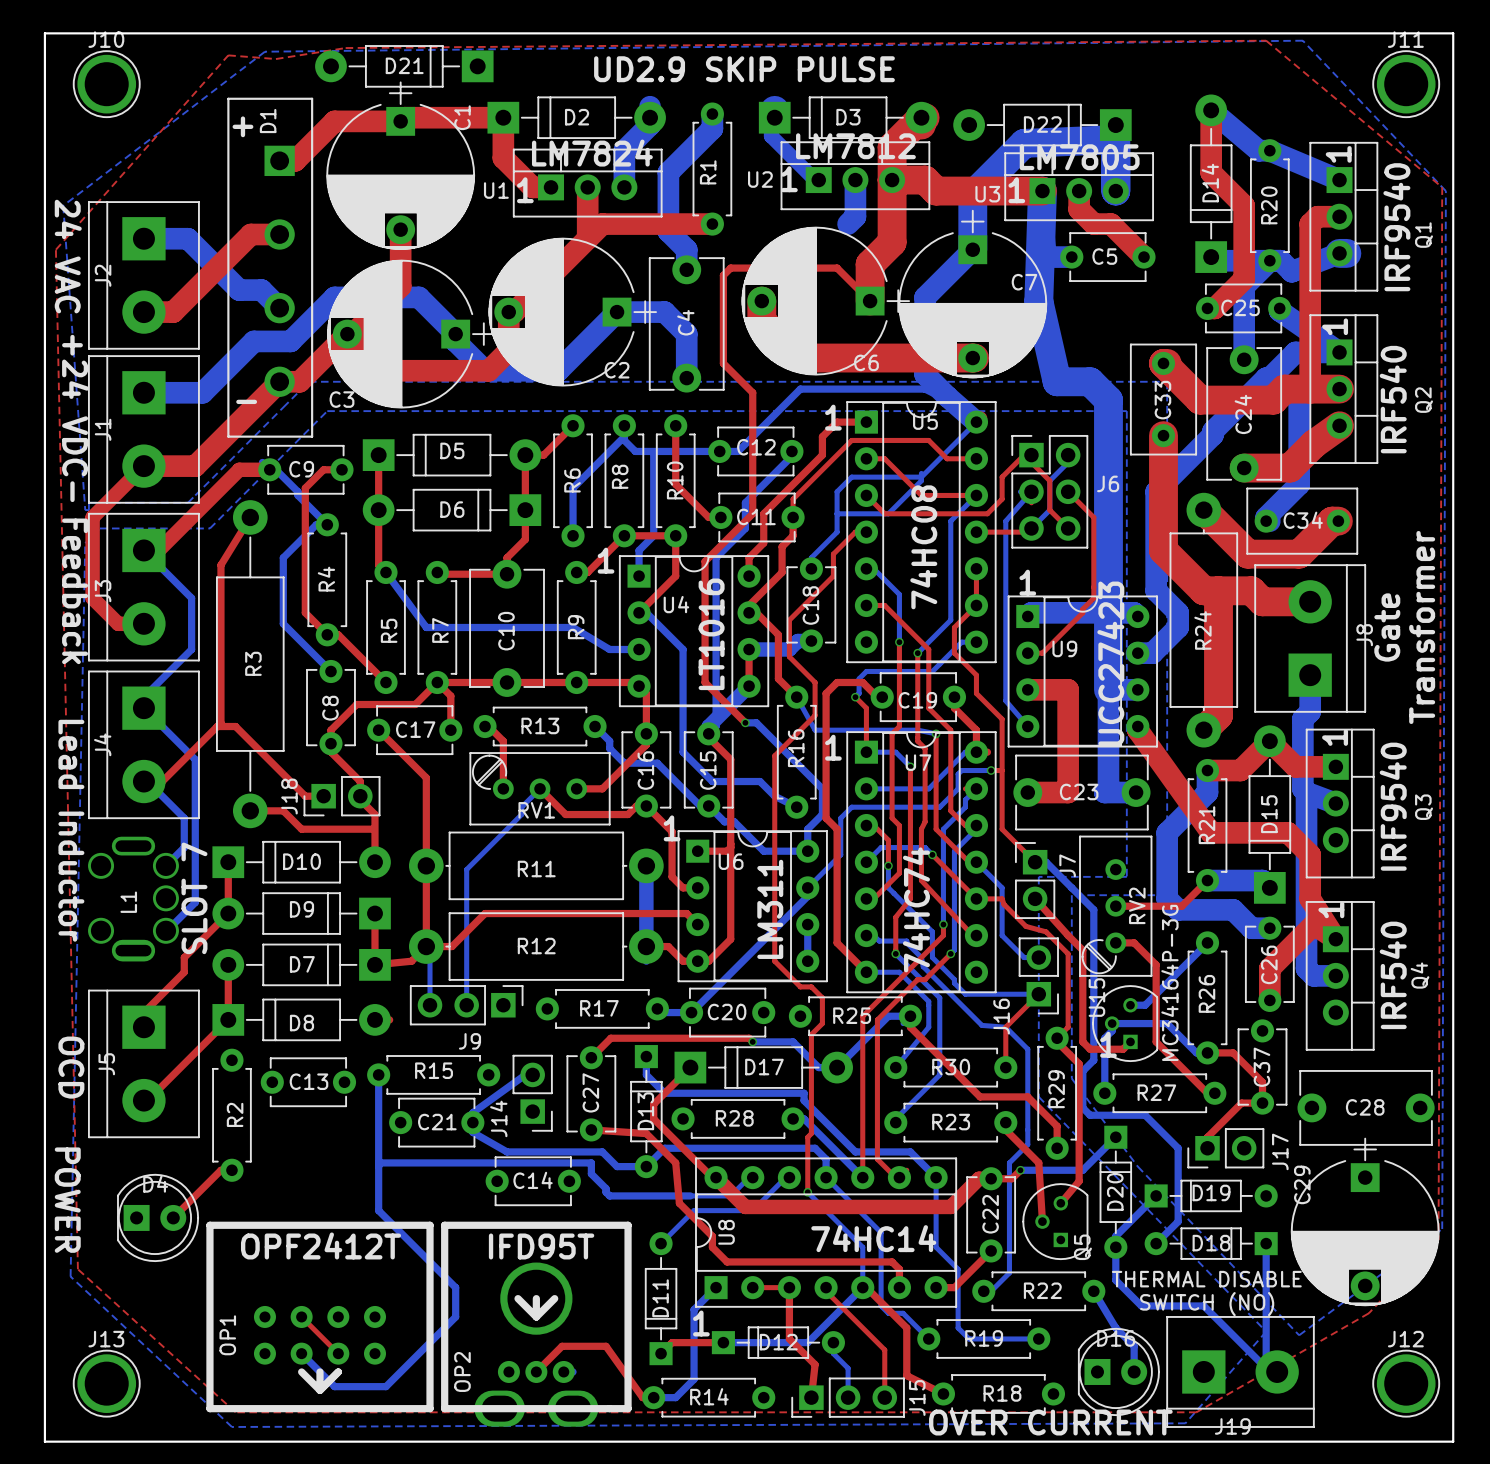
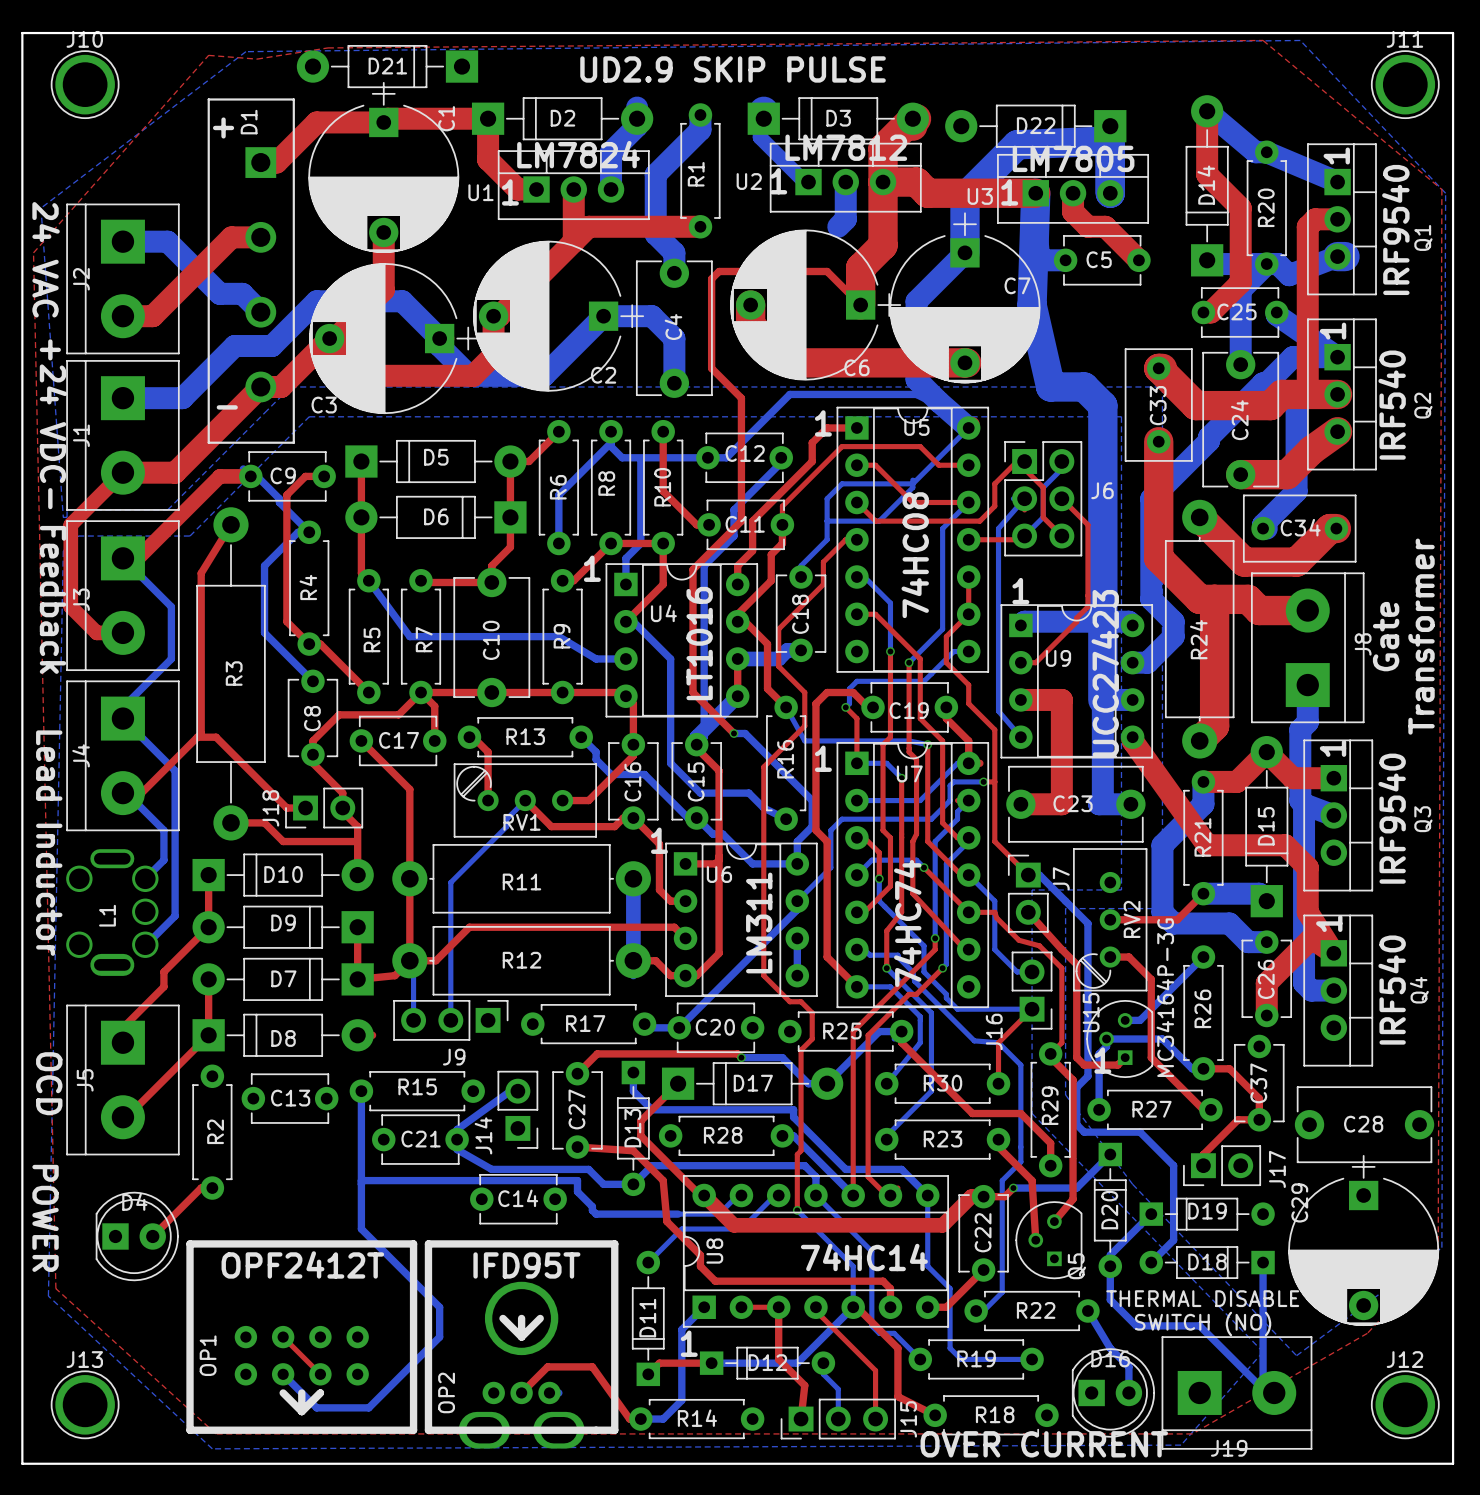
text: SLOT 7 (194, 898) -> none

